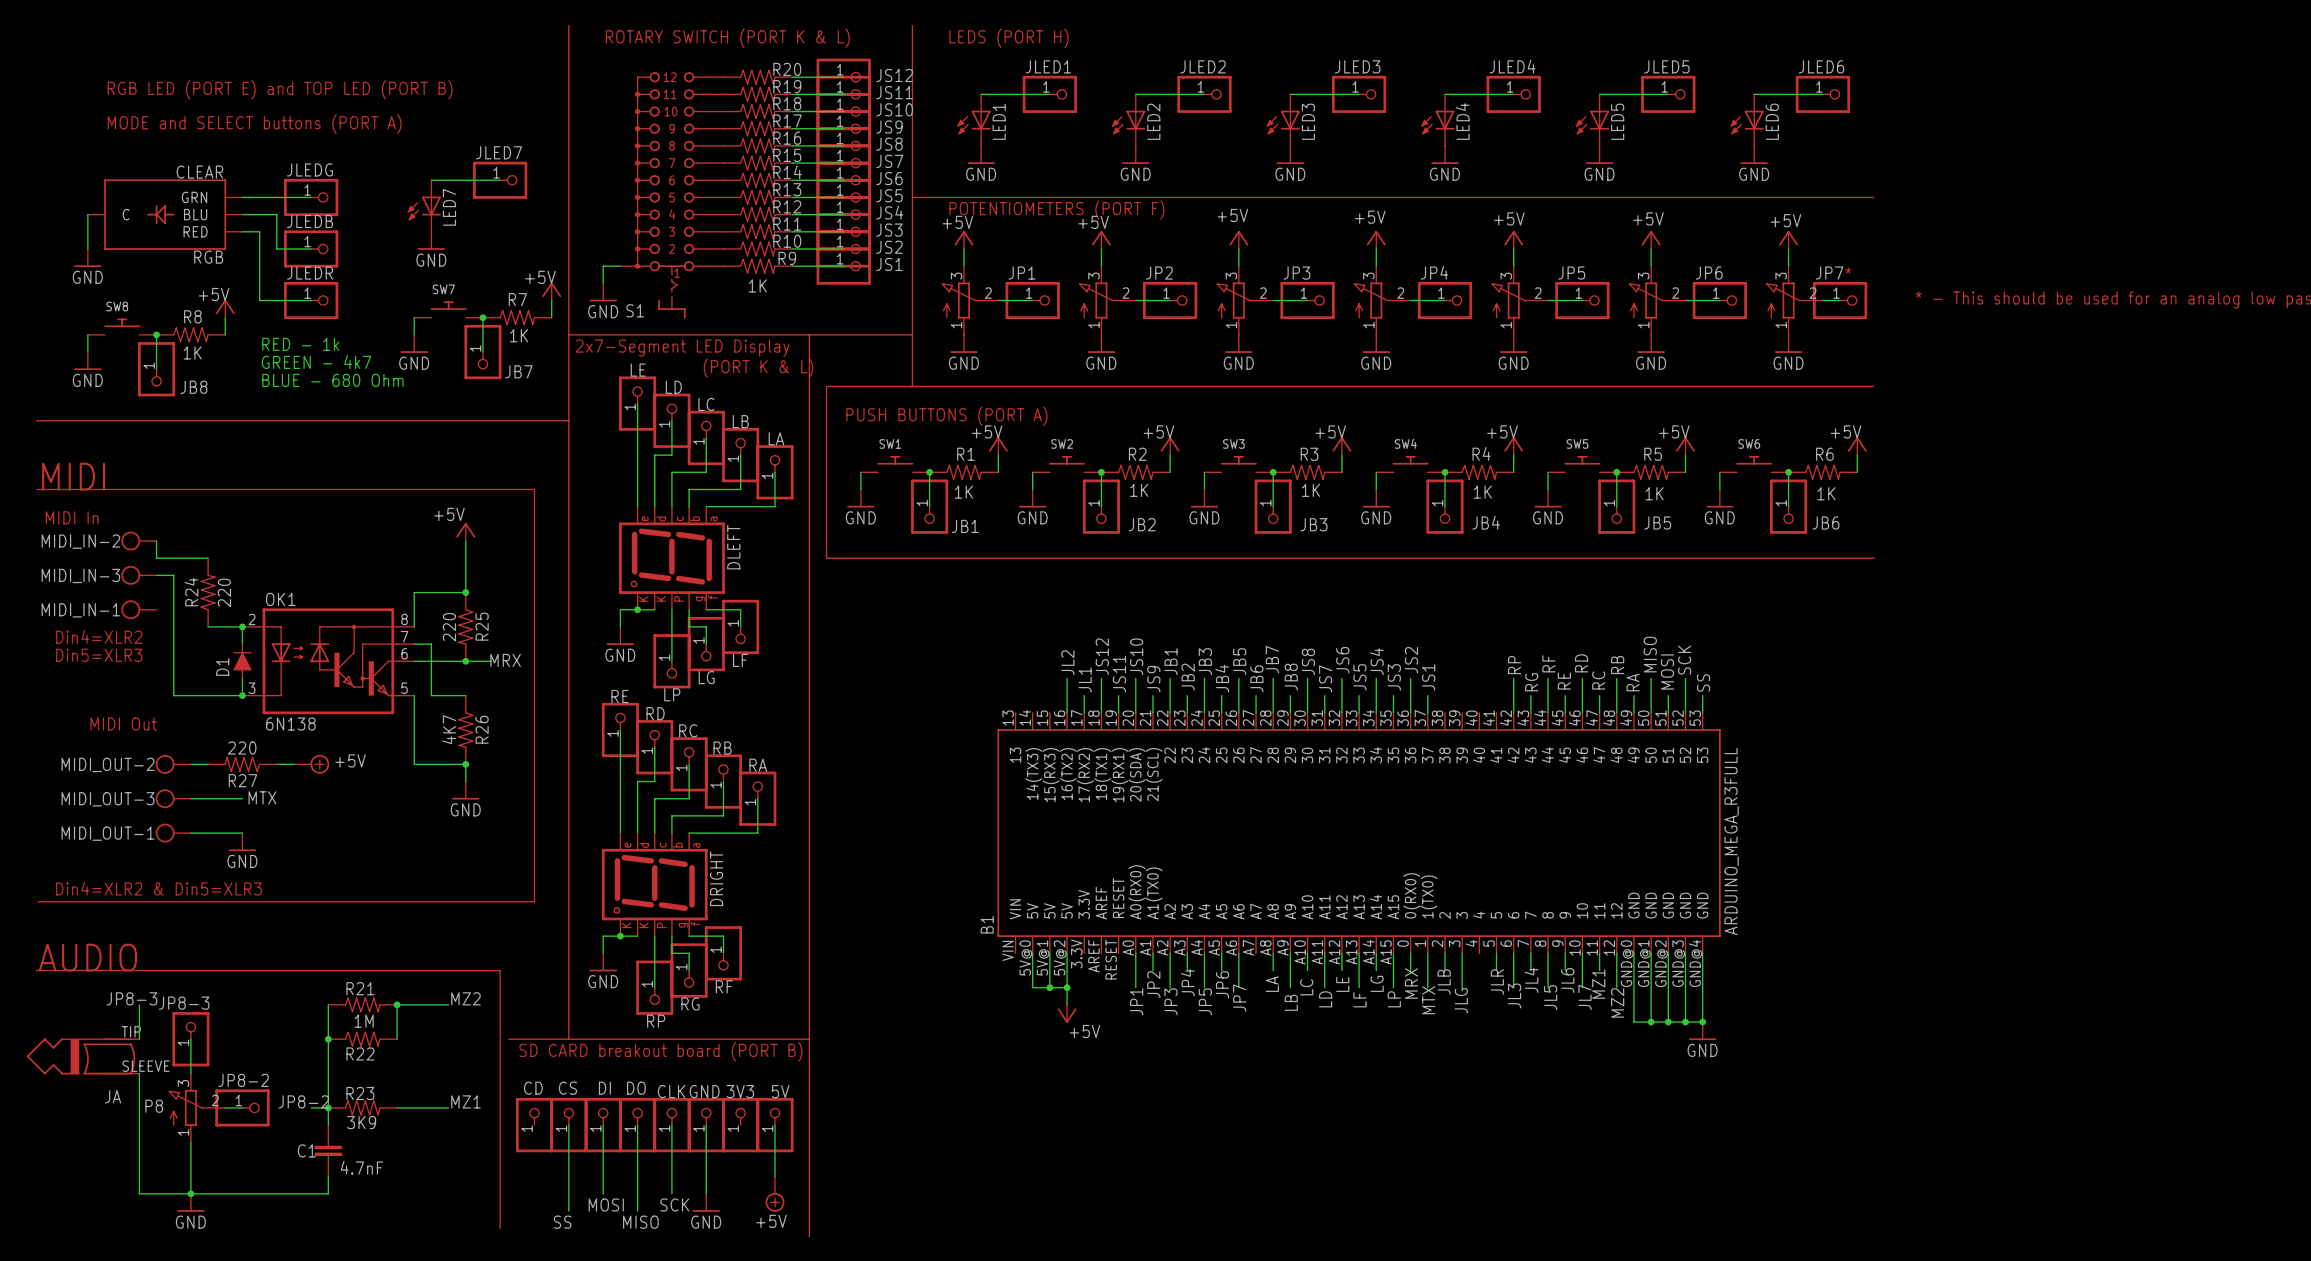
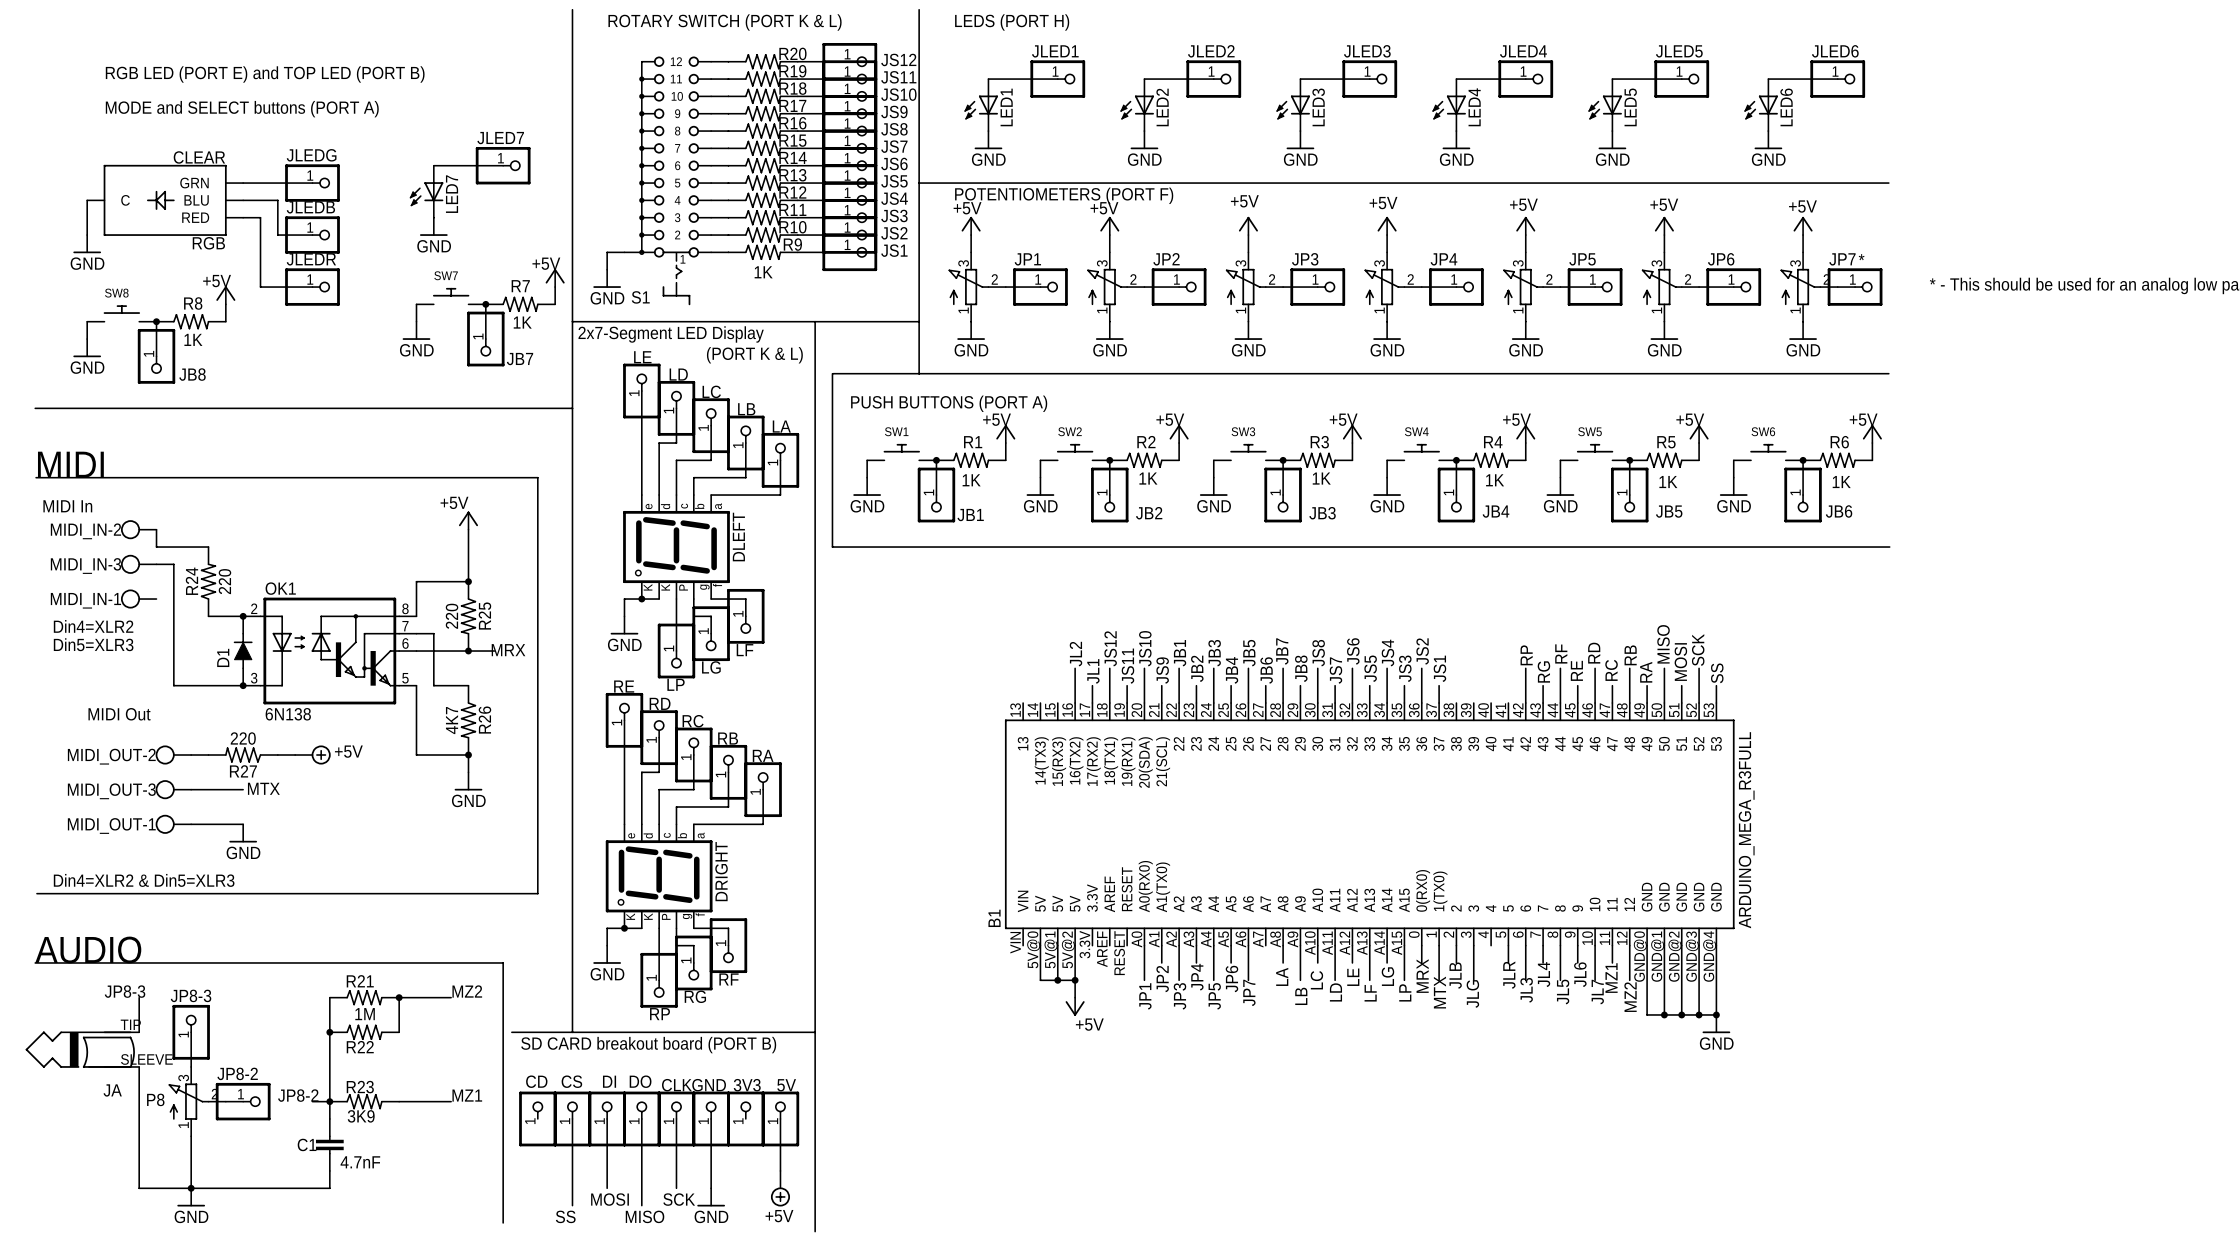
text: RED - 1k (300, 344) -> none
text: GREEN - 4k7 (316, 362) -> none
text: BLUE - 680 Ohm (332, 380) -> none

